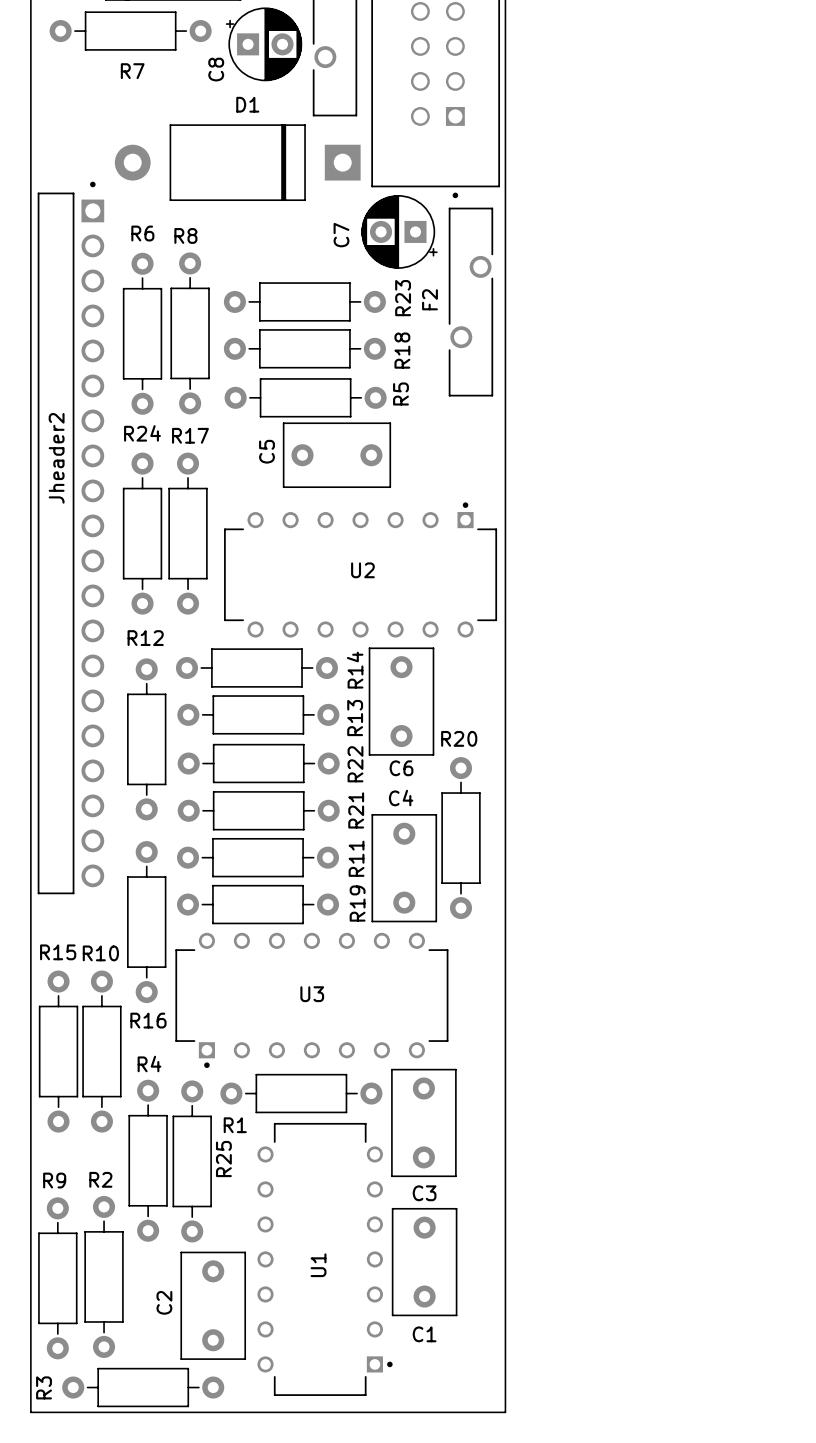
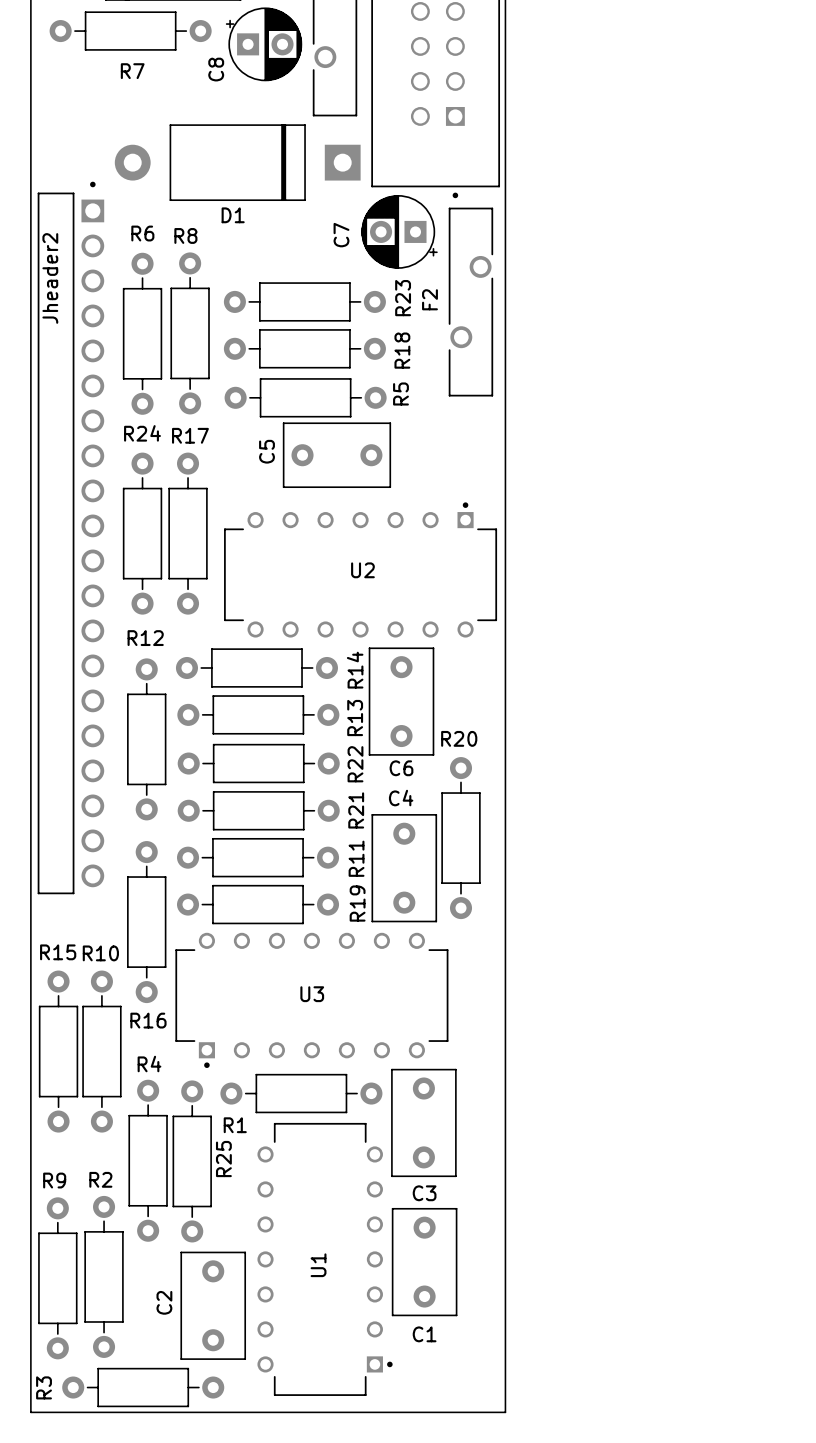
D1 name position: D1 (247, 104) -> D1 (233, 215)
Jheader2 name position: Jheader2 (56, 458) -> Jheader2 (50, 278)

